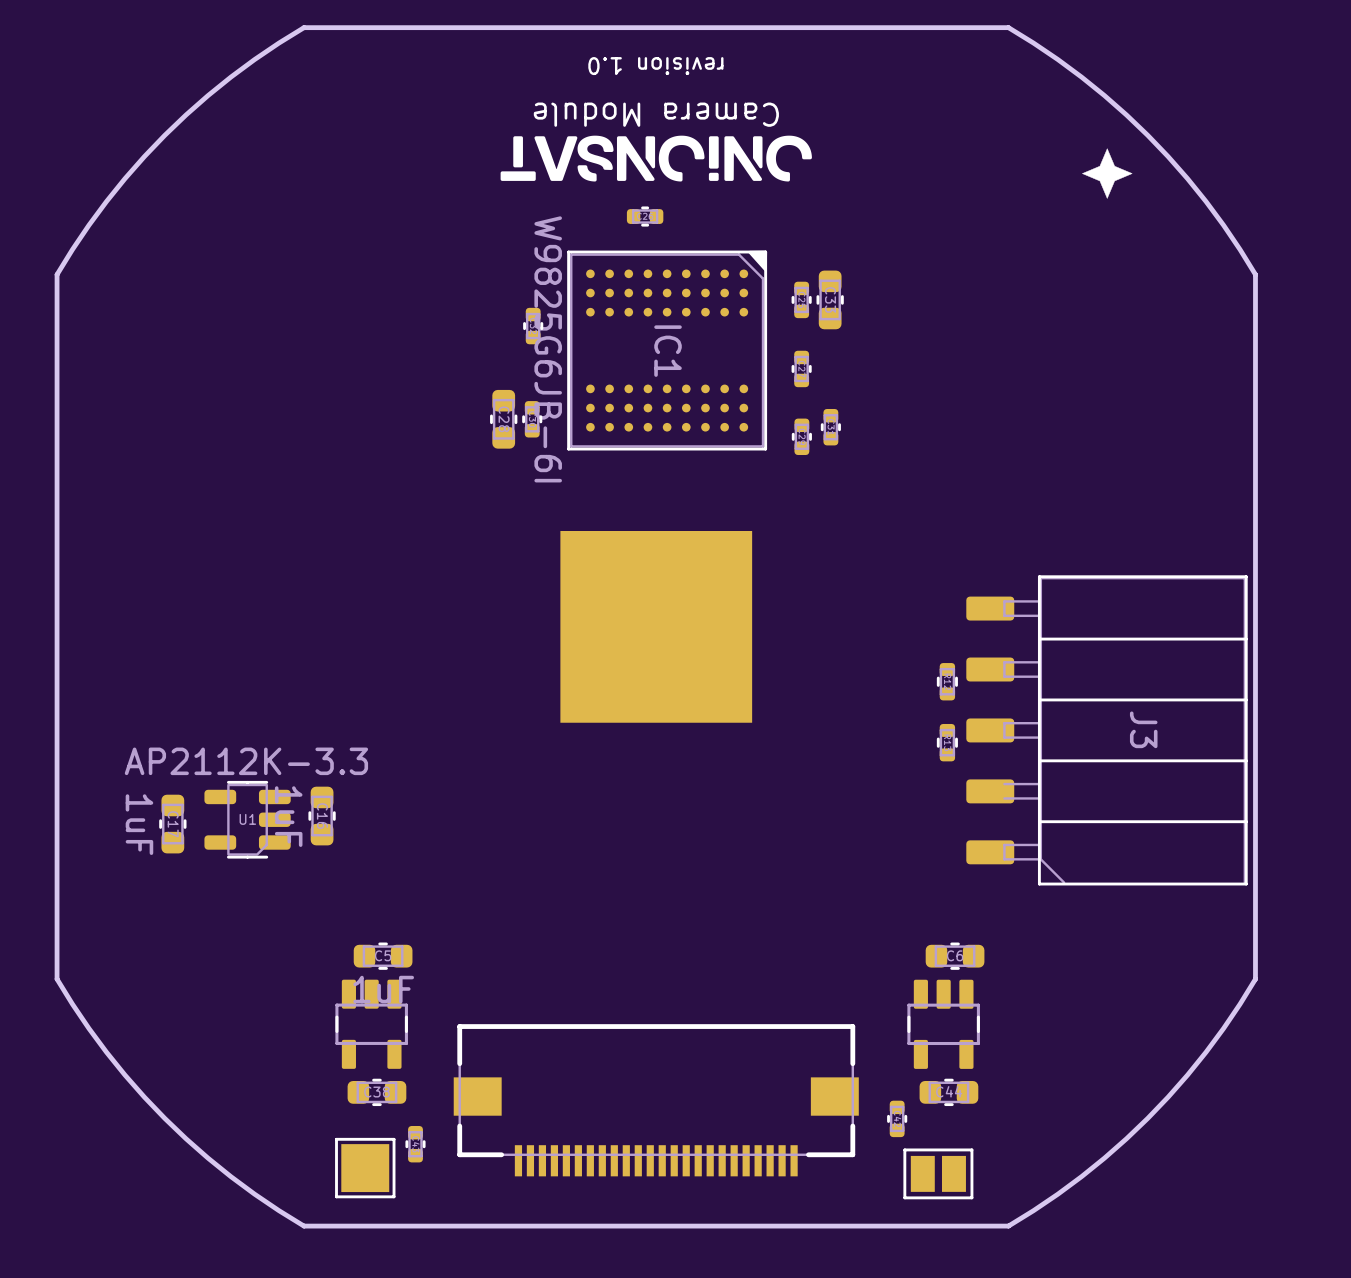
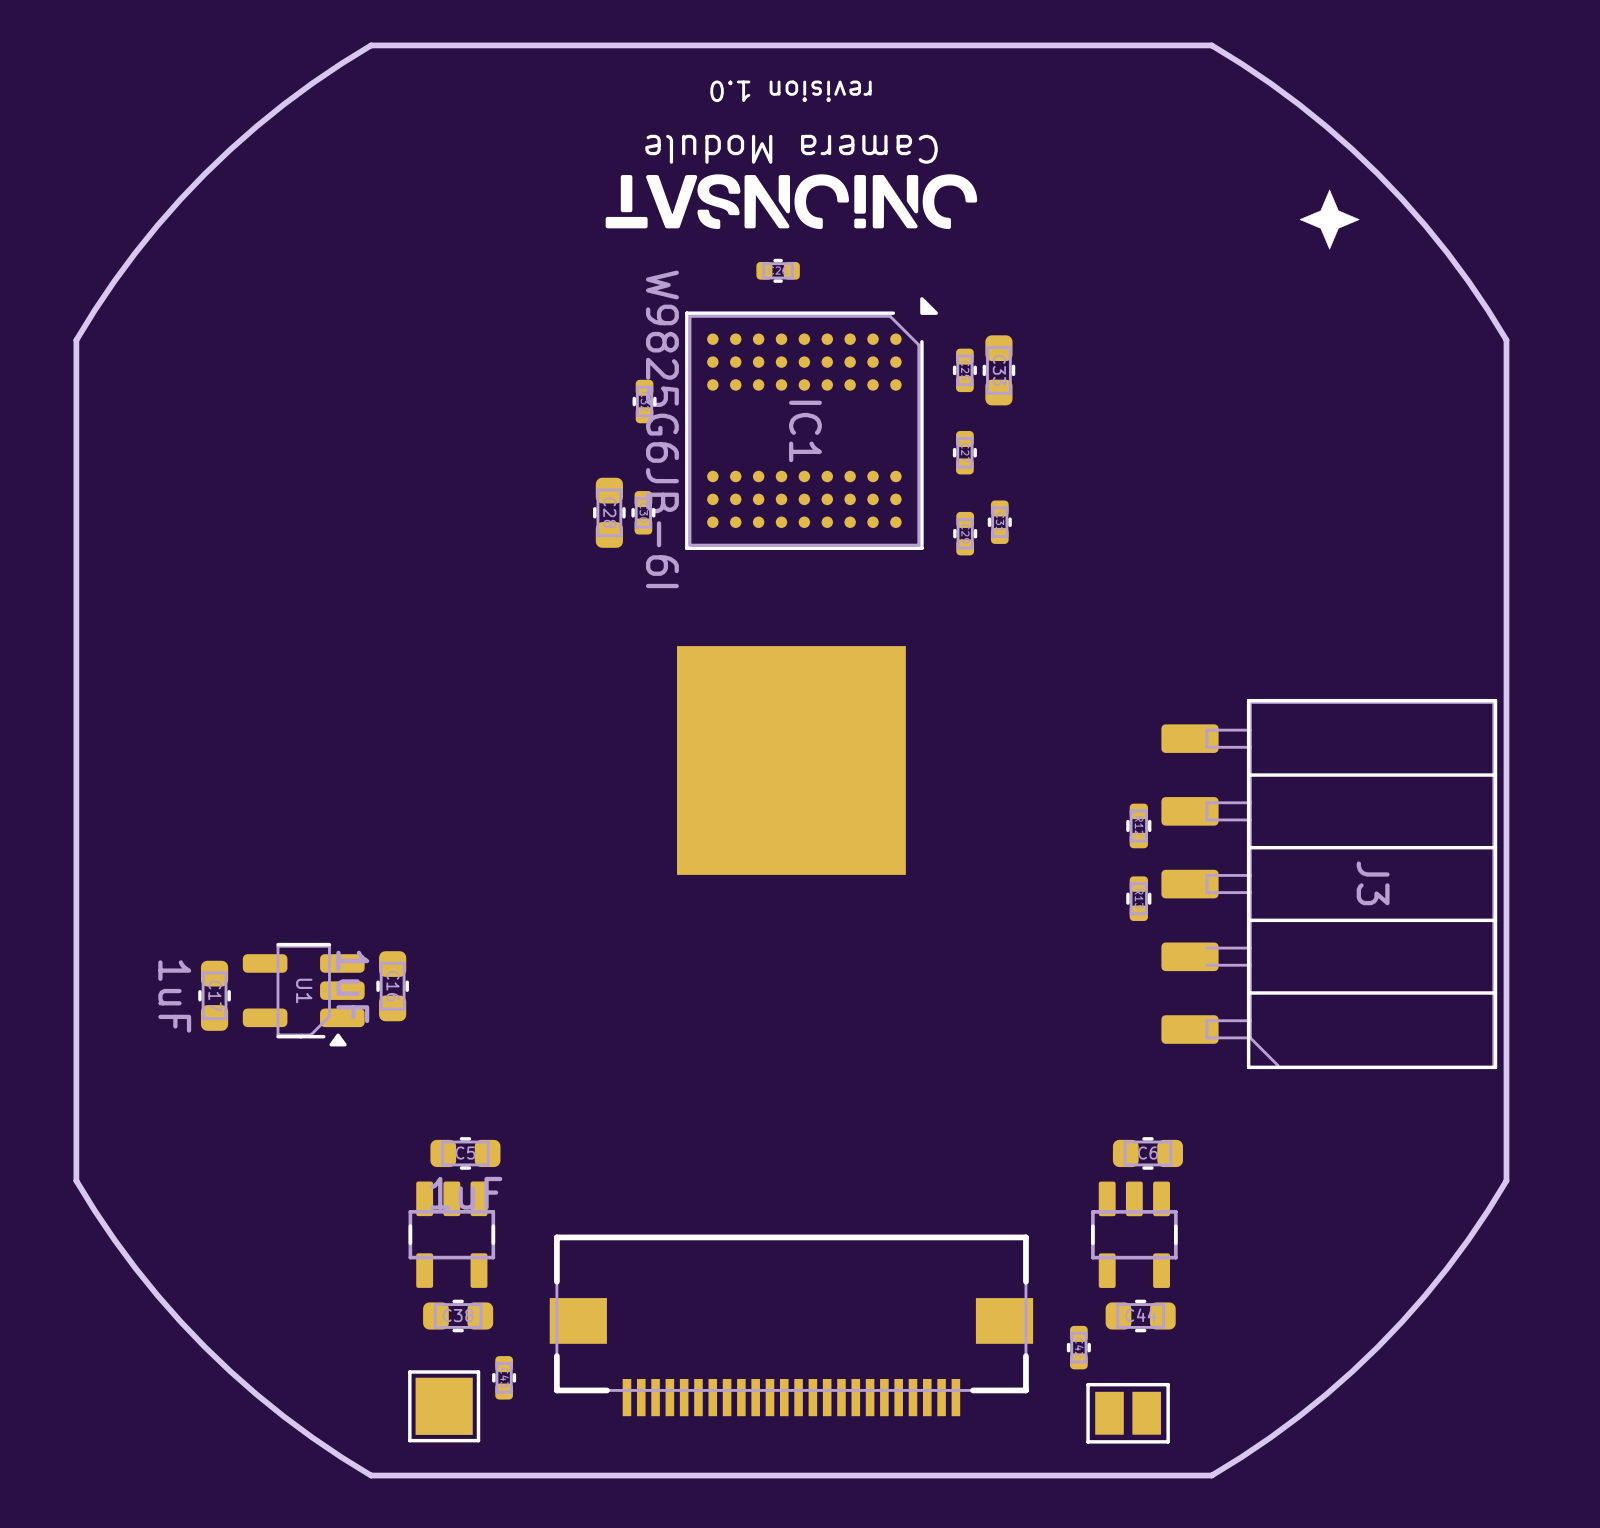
IC1 footprint: [567, 250, 768, 451] -> [685, 297, 938, 551]
U1 value: AP2112K-3.3 (246, 761) -> none
U1 footprint: [204, 780, 291, 859] -> [242, 942, 365, 1047]
U1 name rotation: 0° (247, 819) -> 90° clockwise (304, 990)

